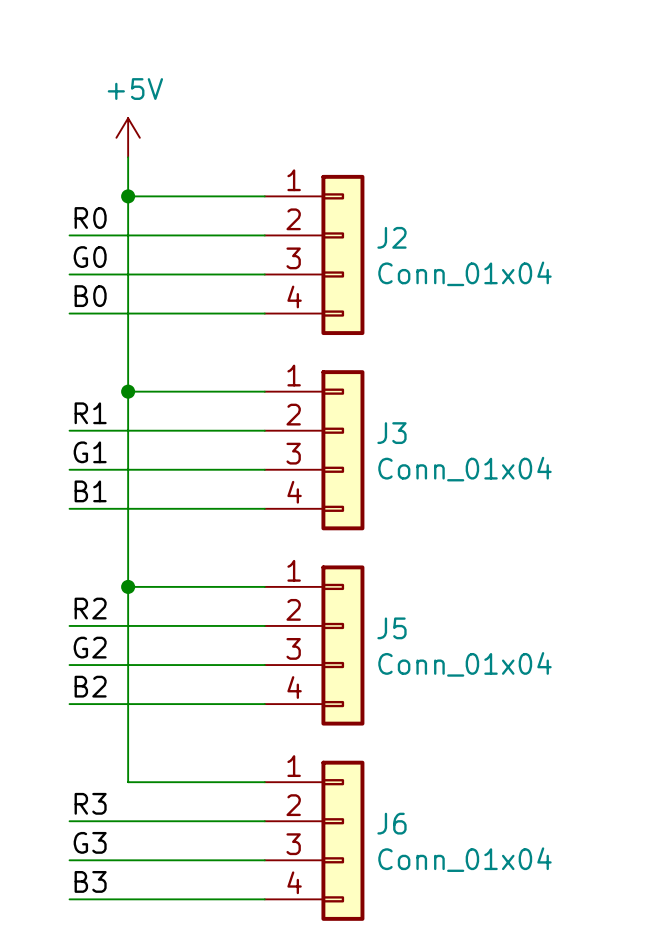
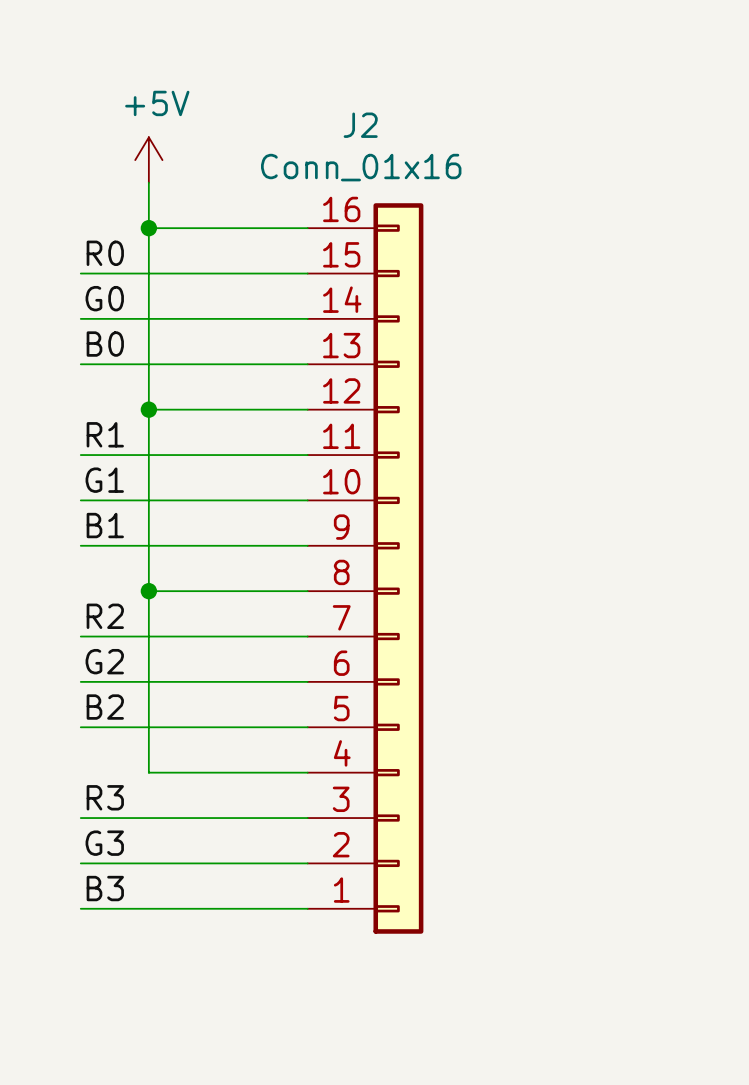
J2 symbol: [264, 174, 365, 336] -> [307, 203, 424, 934]
J2 name position: J2 (391, 237) -> J2 (360, 125)
J2 value: Conn_01x04 (464, 273) -> Conn_01x16 (361, 167)
wire: none -> (148, 409) (307, 409)
label: none -> R1 (105, 434)
junction position: (128, 391) -> (148, 409)
label: R1 (90, 413) -> G1 (104, 480)
J3: Conn_01x04 (314, 450) -> none
label: G1 (90, 452) -> B1 (105, 525)
label: B1 (90, 491) -> none
wire: (69, 508) (128, 508) -> (80, 455) (148, 455)
junction: none -> (148, 591)
label: none -> R2 (105, 616)
wire: none -> (80, 681) (148, 681)
junction: (128, 586) -> none
label: R2 (90, 608) -> B2 (105, 707)
J5: Conn_01x04 (314, 645) -> none
label position: G2 (90, 647) -> G2 (104, 661)
wire: (69, 665) (128, 665) (128, 782) -> (80, 908) (148, 908)
label: B2 (90, 686) -> R3 (105, 797)
label: R3 (90, 803) -> none
wire: (69, 821) (264, 821) -> (80, 636) (307, 636)
J6: Conn_01x04 (314, 840) -> none
label position: G3 (90, 842) -> G3 (104, 843)
wire: (69, 860) (264, 860) -> (80, 863) (307, 863)
label position: B3 (90, 881) -> B3 (105, 888)
wire: (69, 899) (264, 899) -> none

